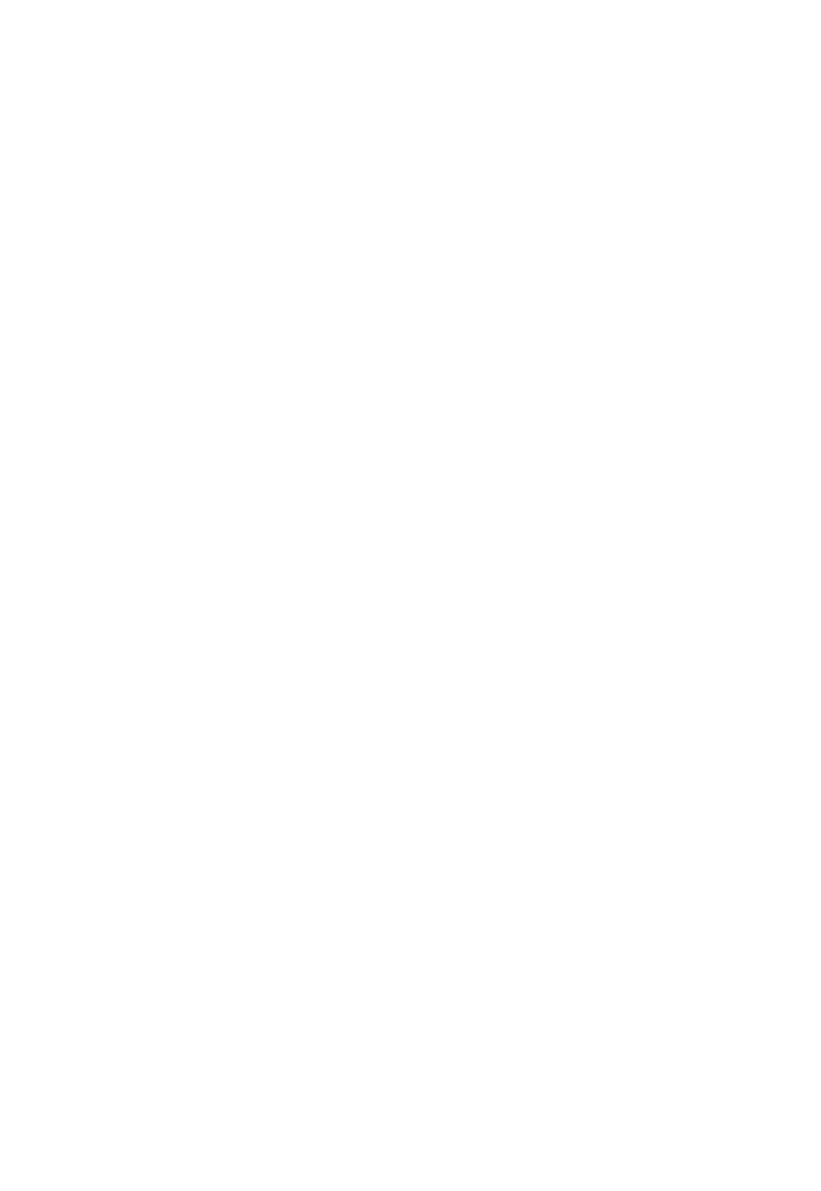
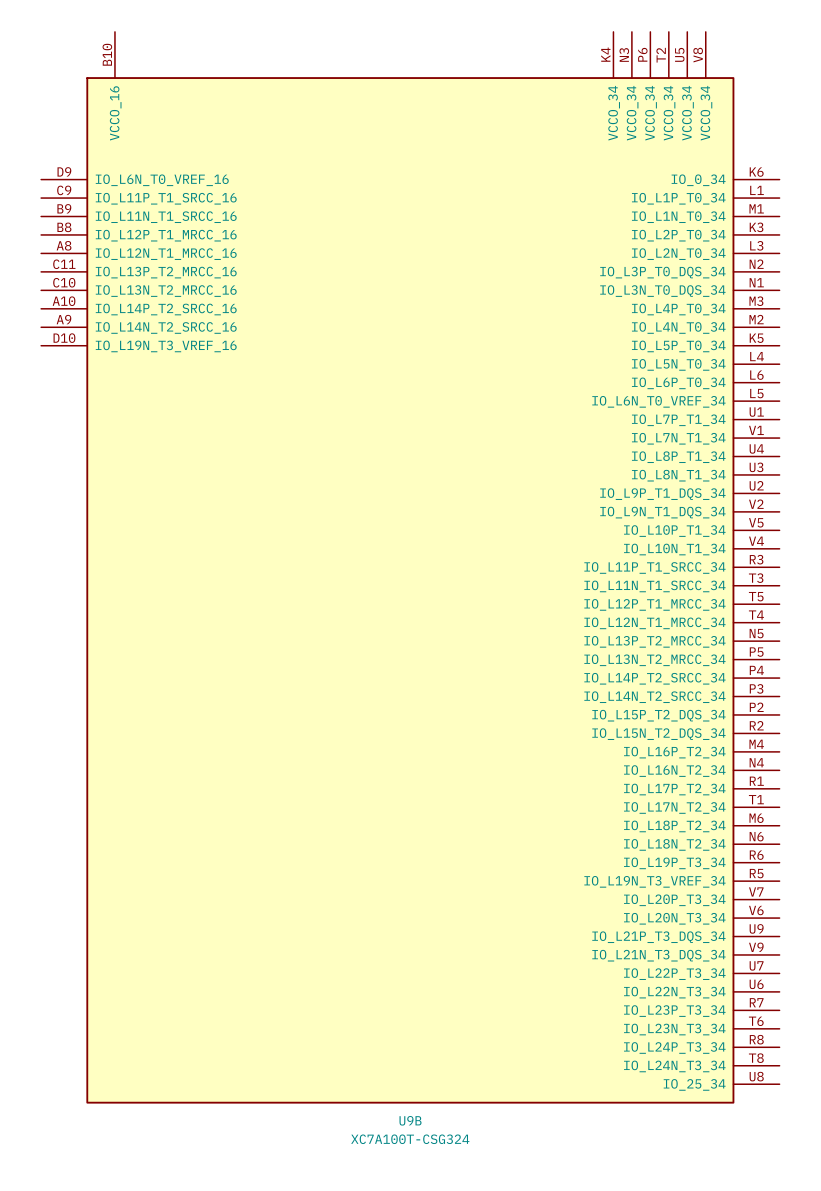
U9B: none -> XC7A100T-CSG324 (410, 567)

